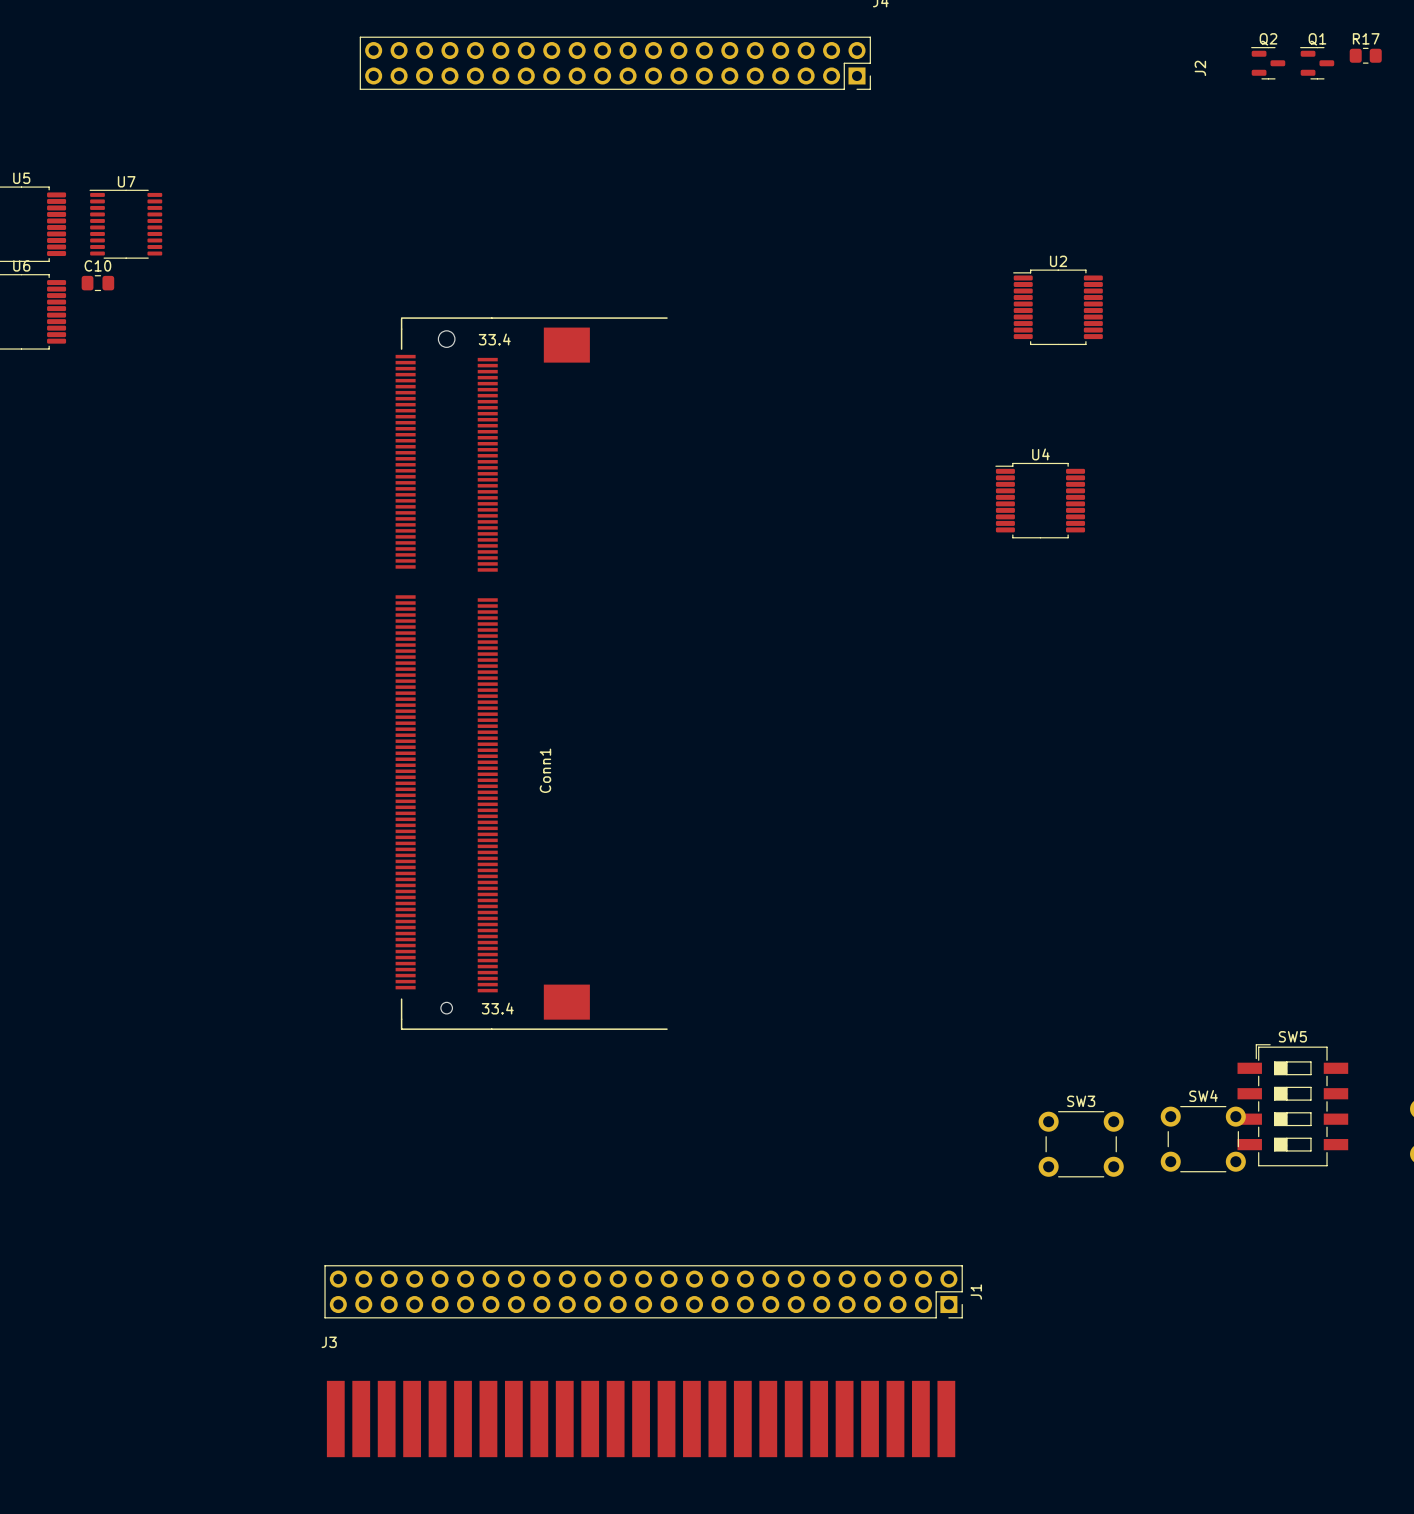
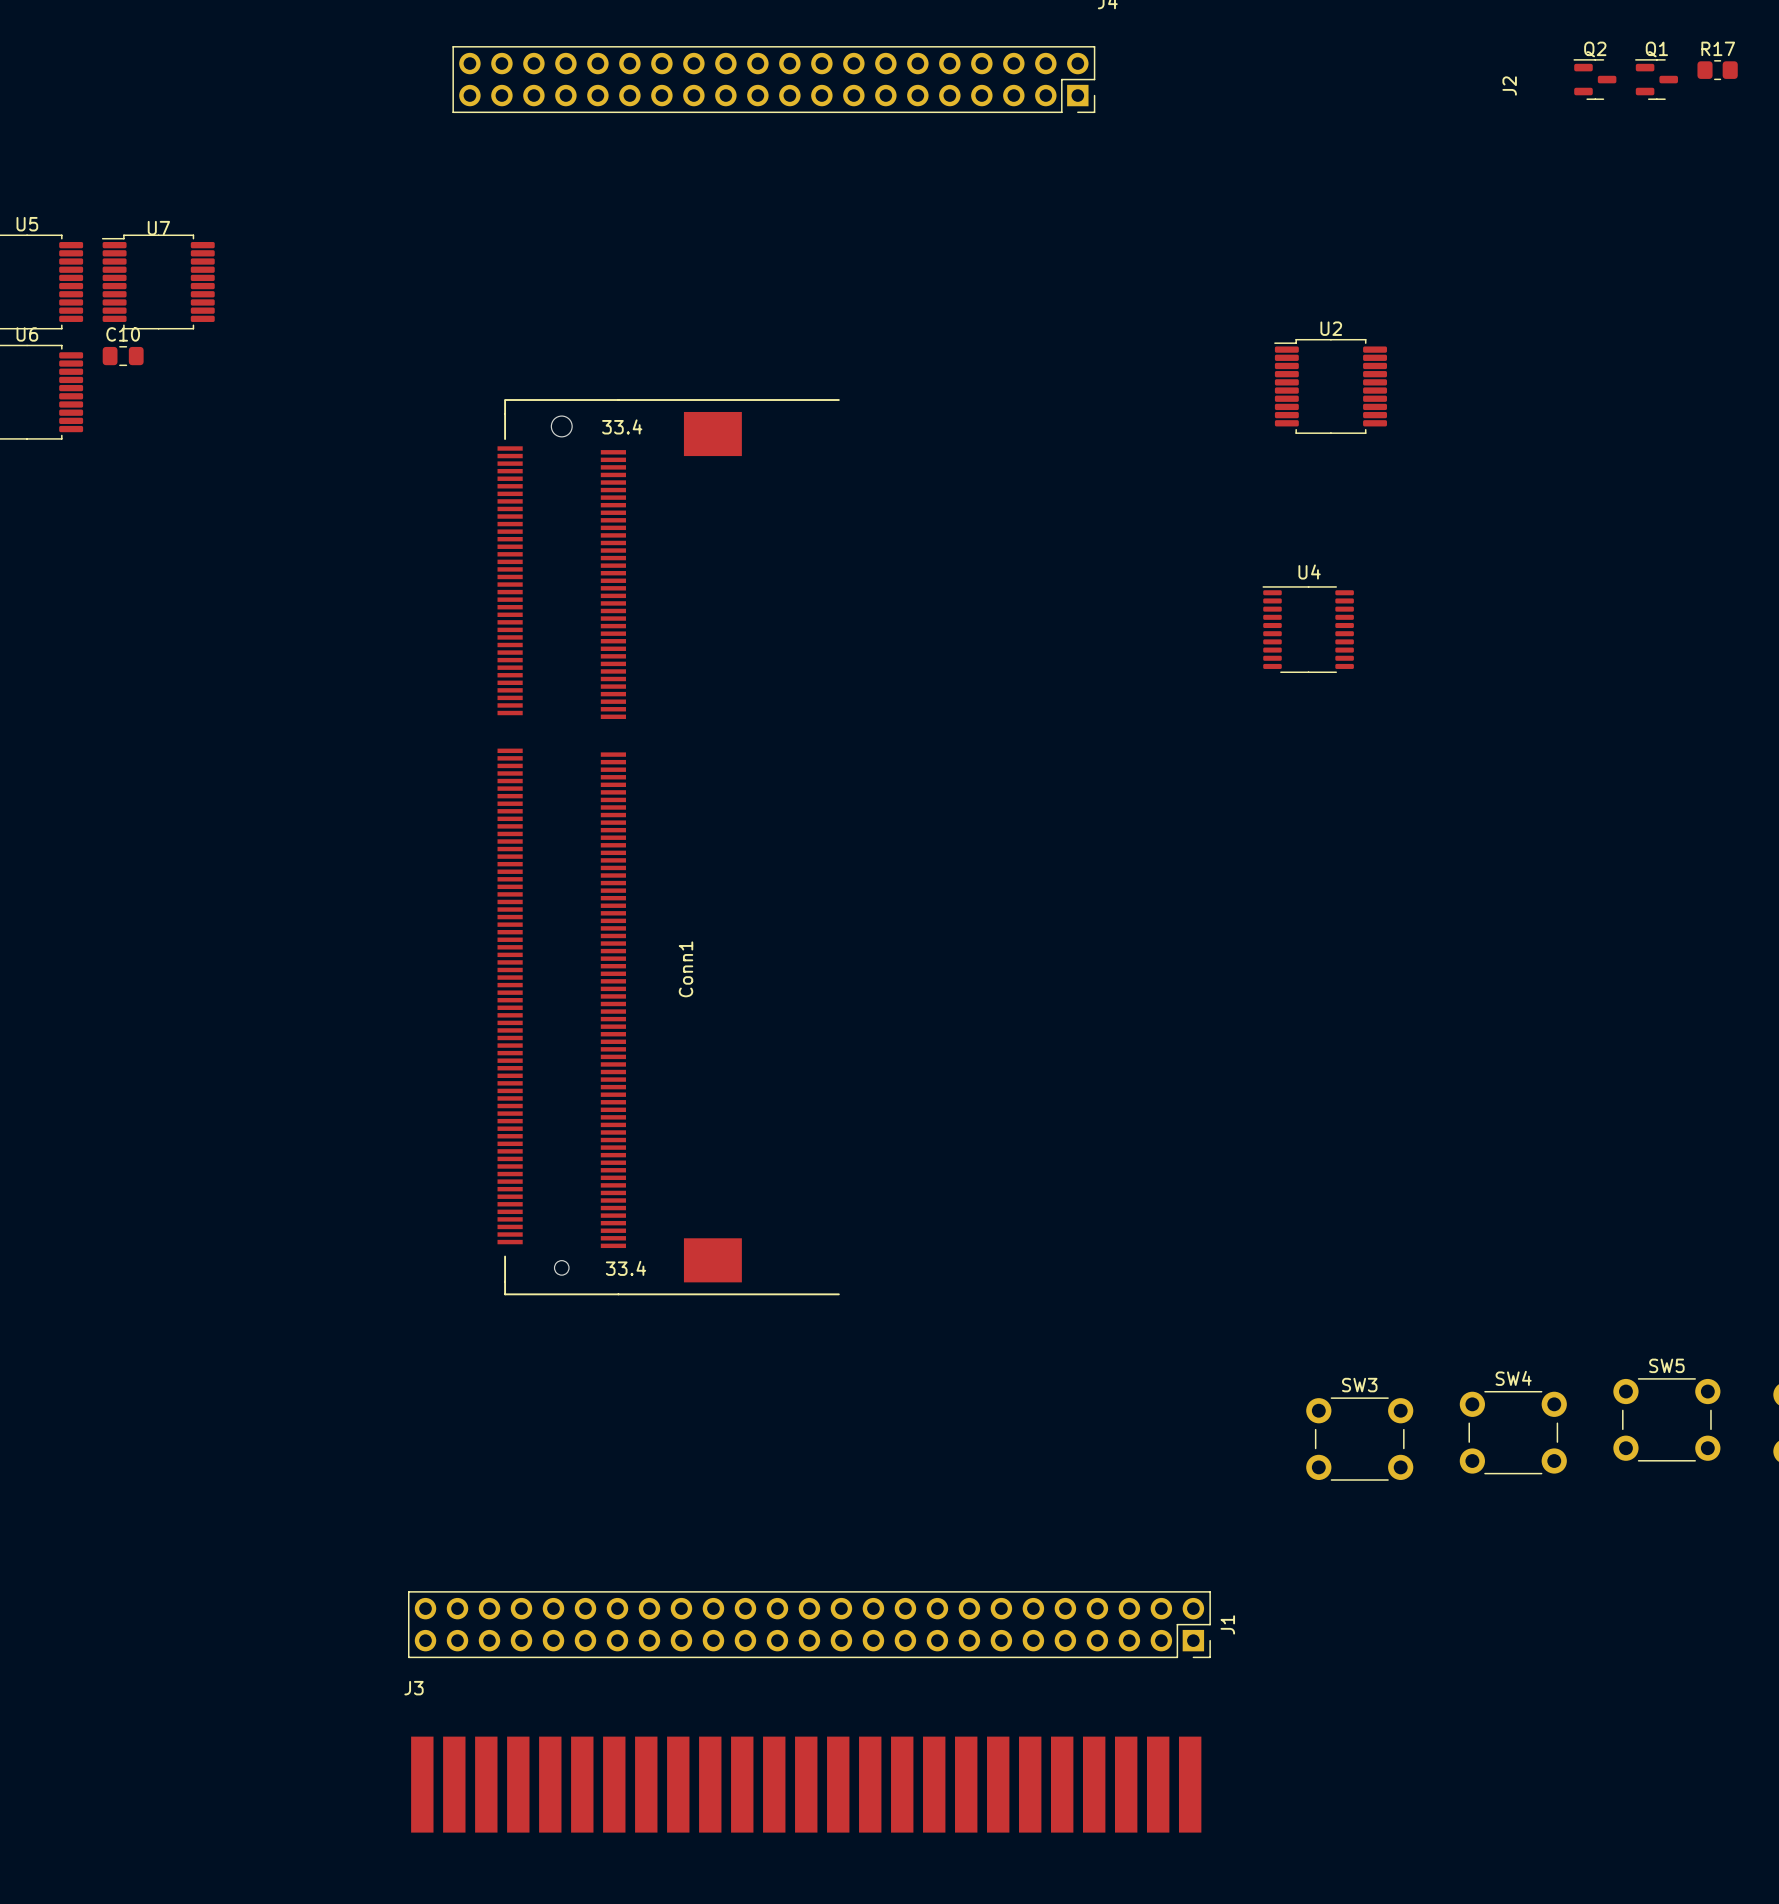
U7 footprint: [89, 189, 163, 259] -> [101, 234, 215, 330]
U4 footprint: [995, 462, 1086, 539] -> [1262, 586, 1354, 674]
SW5 name position: SW5 (1292, 1036) -> SW5 (1666, 1365)
SW5 footprint: [1237, 1044, 1349, 1167] -> [1613, 1378, 1721, 1462]

